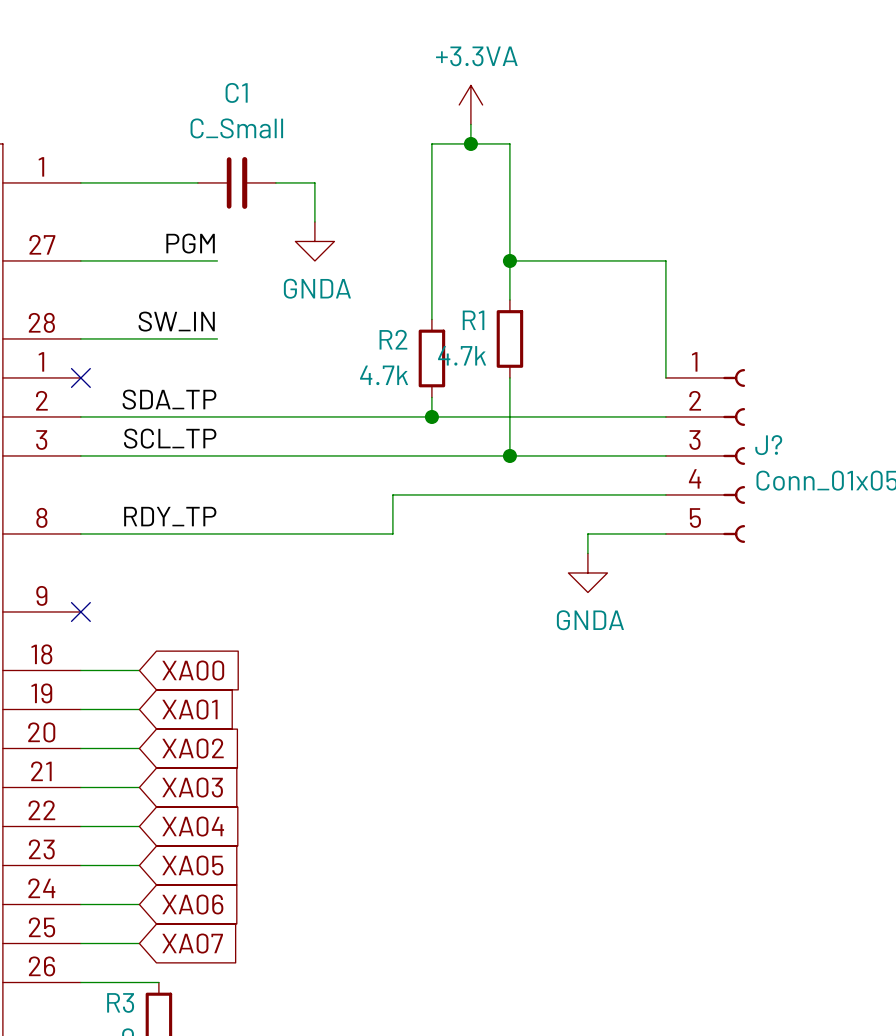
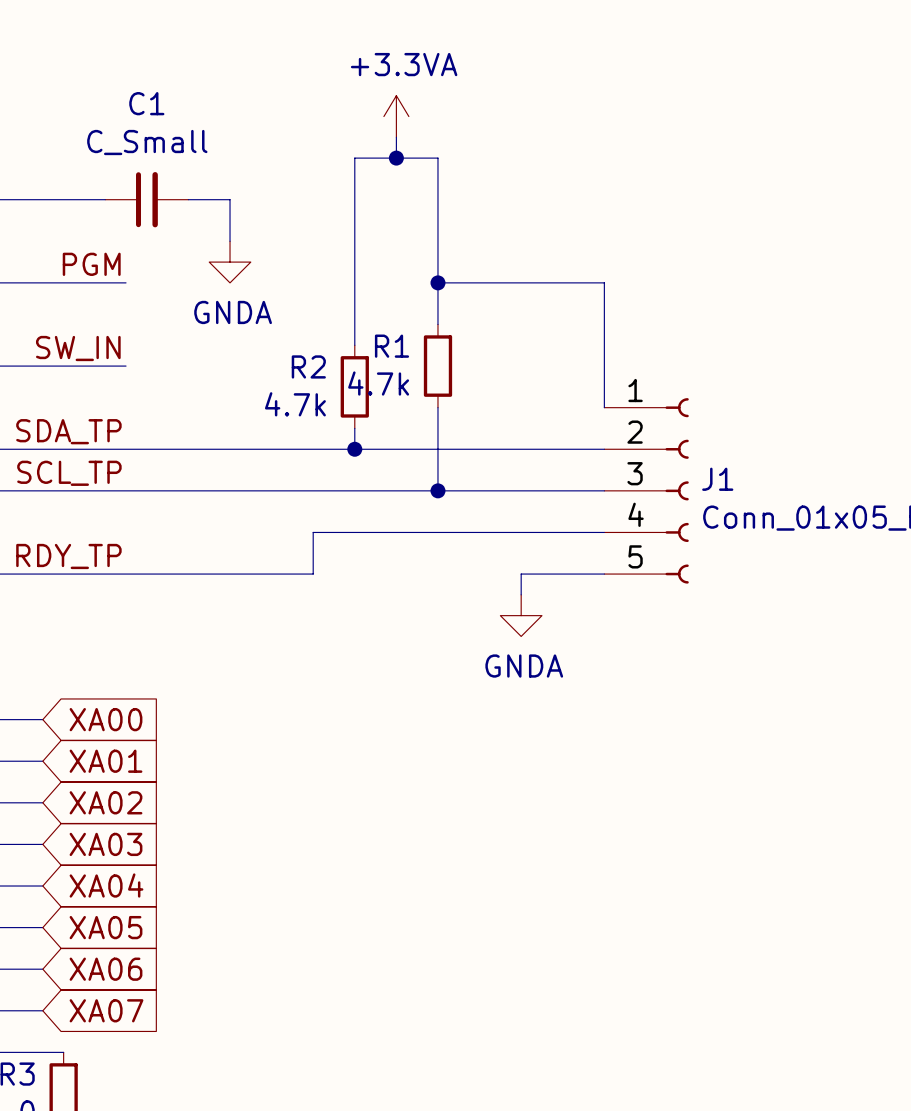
J? name: J? (768, 445) -> J1 (717, 479)

